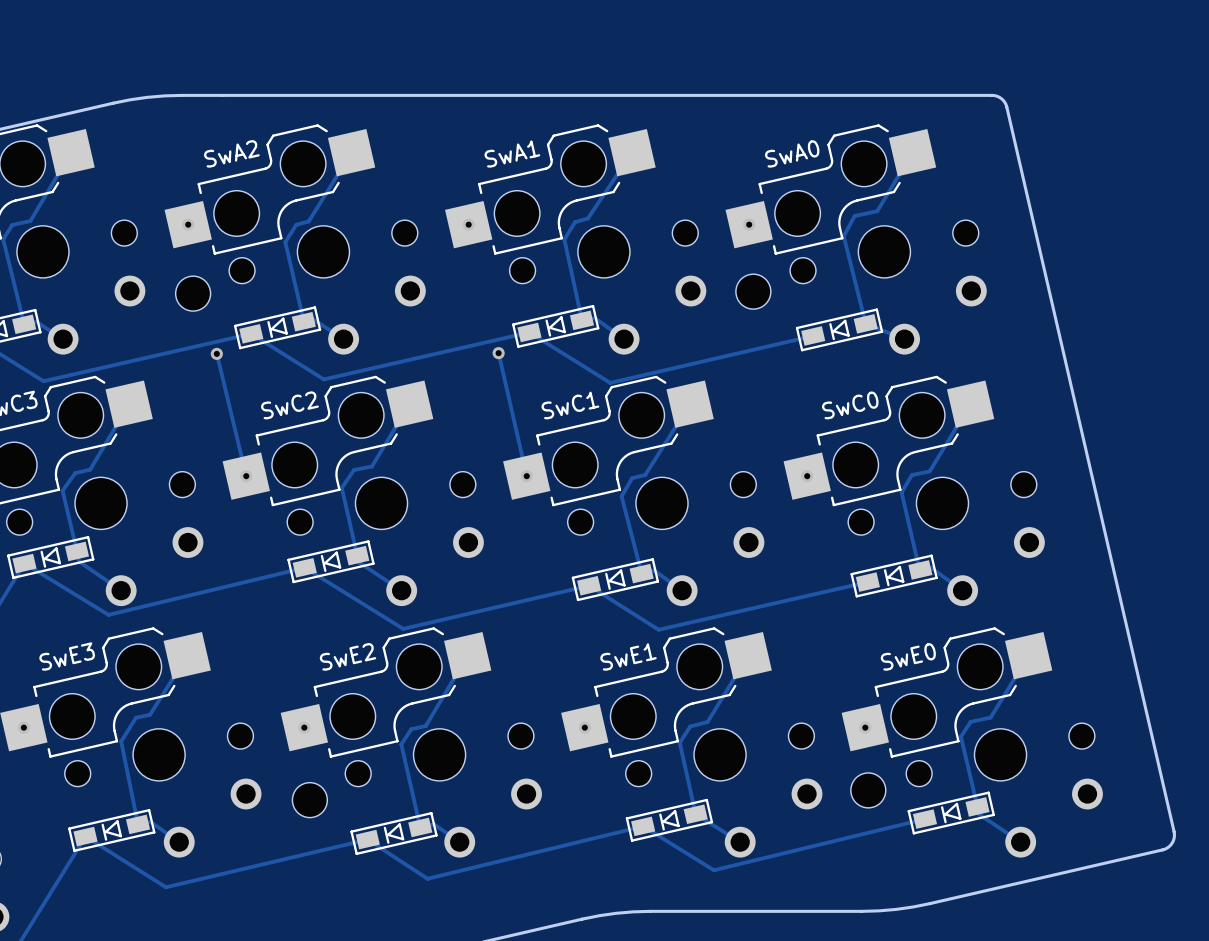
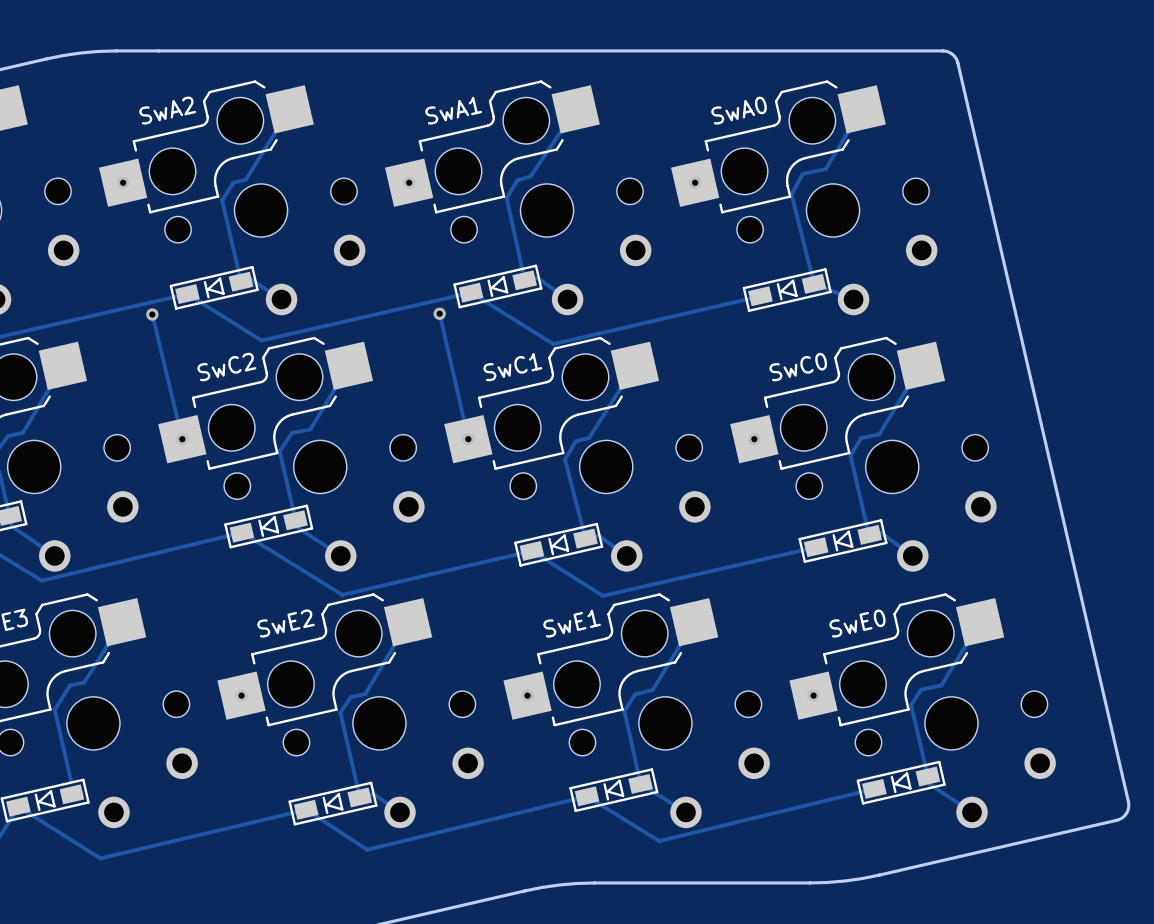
part: (753, 291) -> none
part: (193, 293) -> none
track: (121, 741) (138, 824) (150, 821) (179, 842) -> (54, 709) (71, 781)
part: (868, 790) -> none
part: (309, 800) -> none

